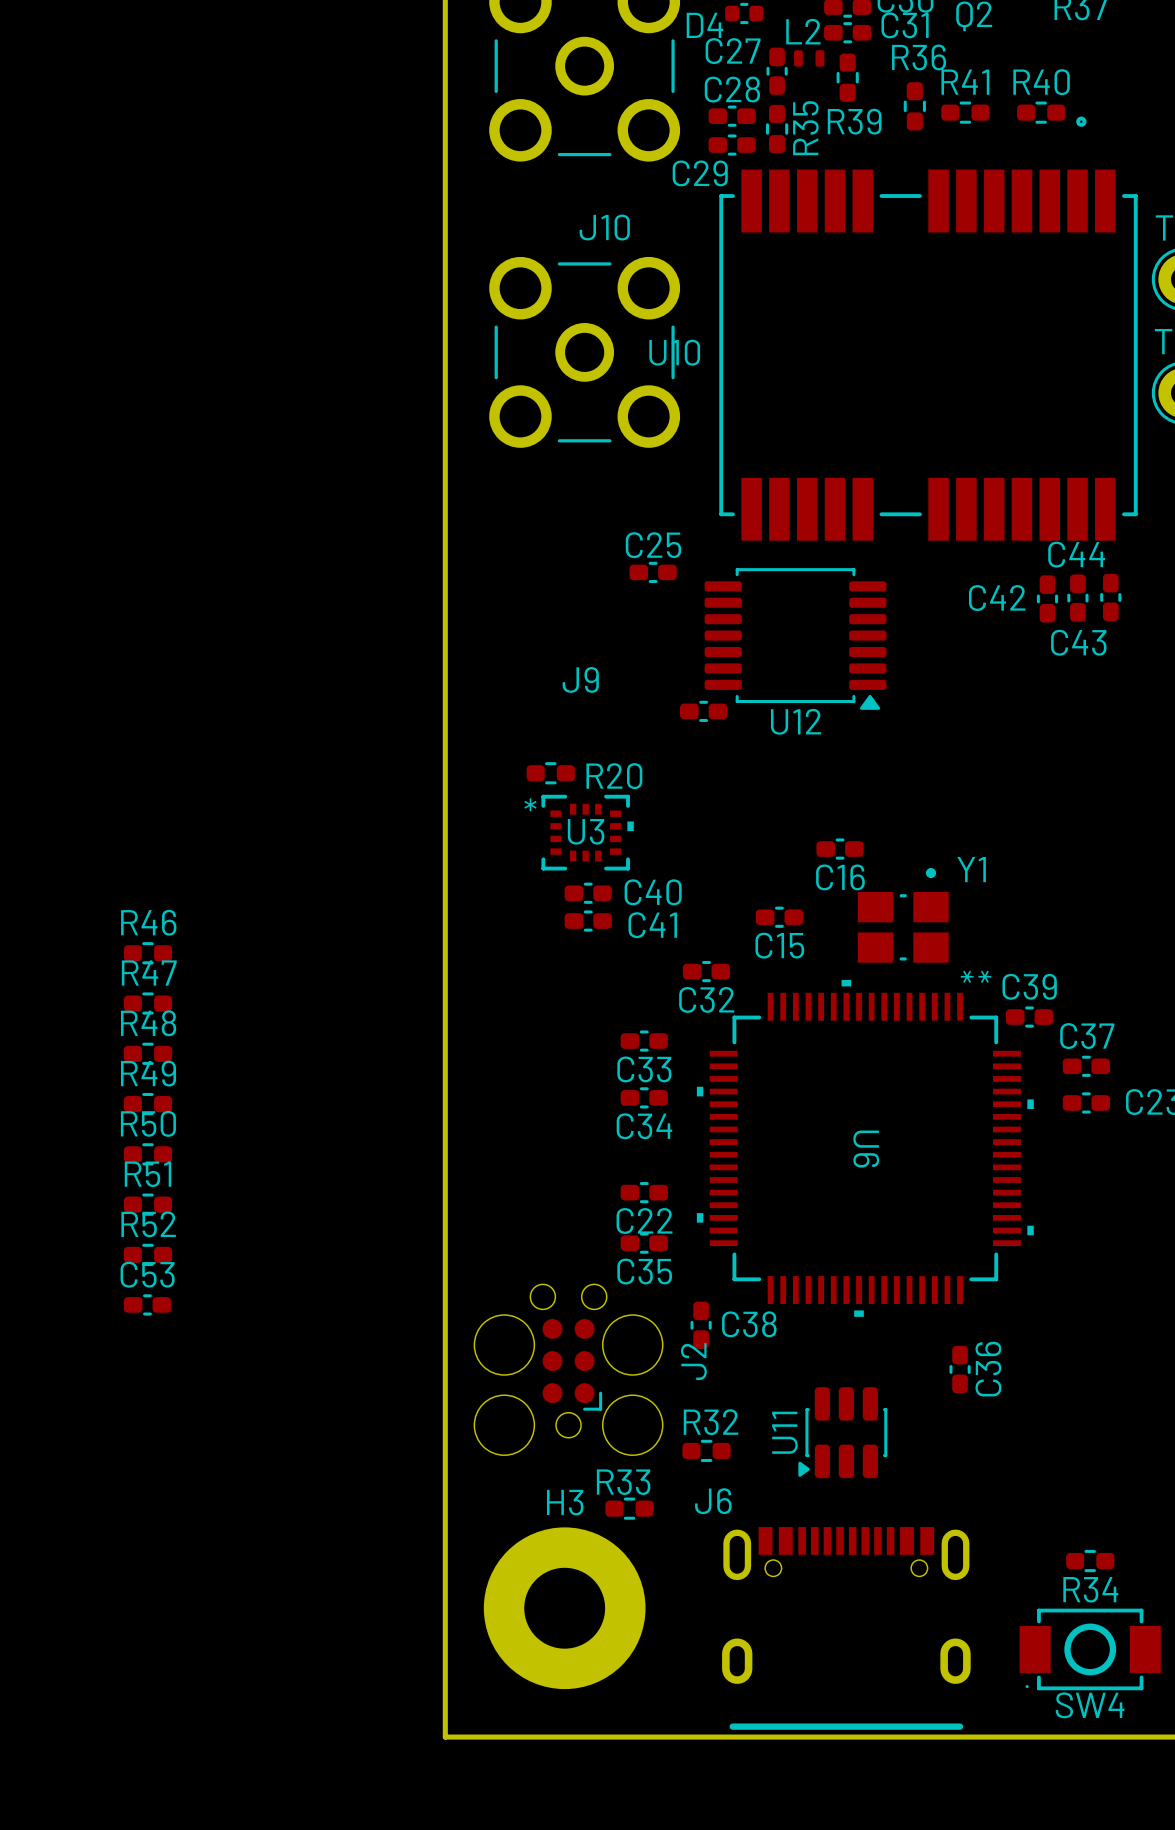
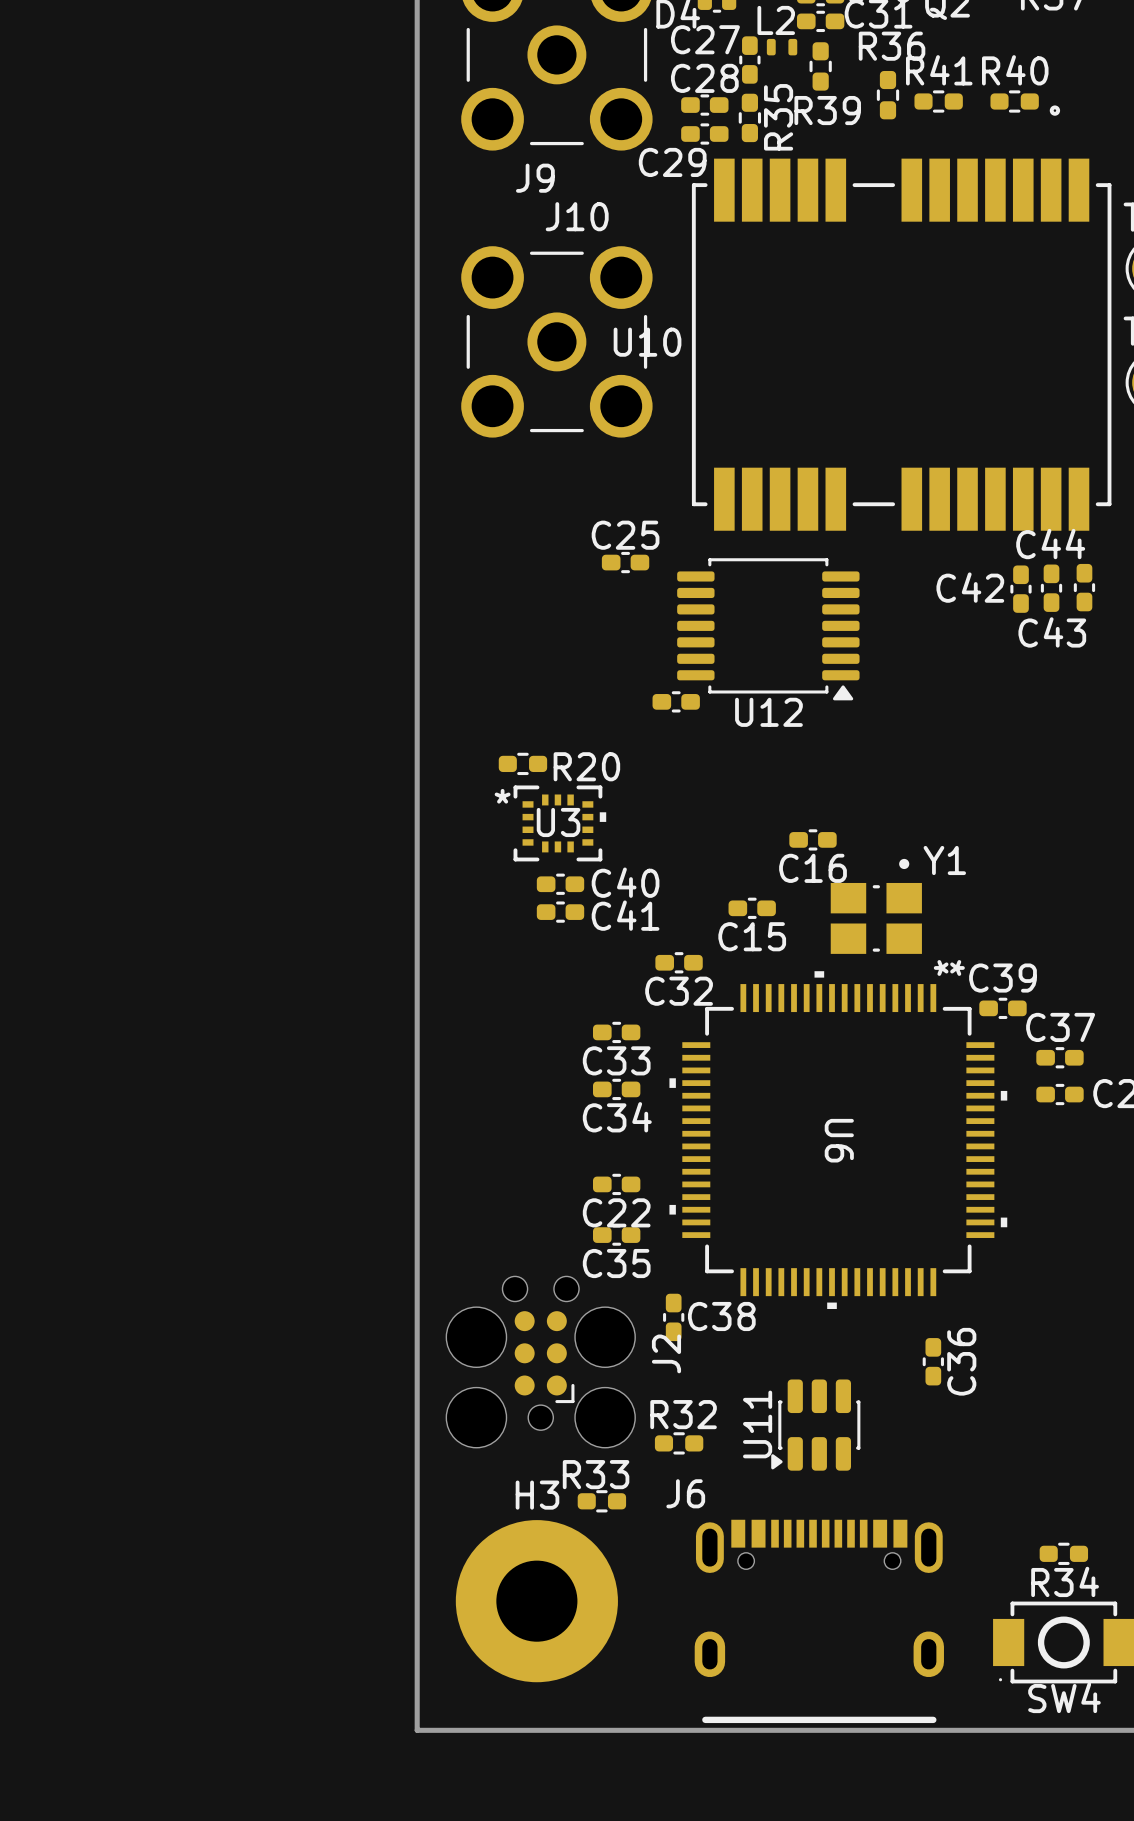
J9 name position: J9 (580, 679) -> J9 (535, 178)
R46: (147, 953) -> none
R47: (147, 1003) -> none
R48: (147, 1053) -> none
R49: (147, 1104) -> none
R50: (147, 1154) -> none
R51: (147, 1204) -> none
R52: (147, 1254) -> none
C53: (147, 1304) -> none

